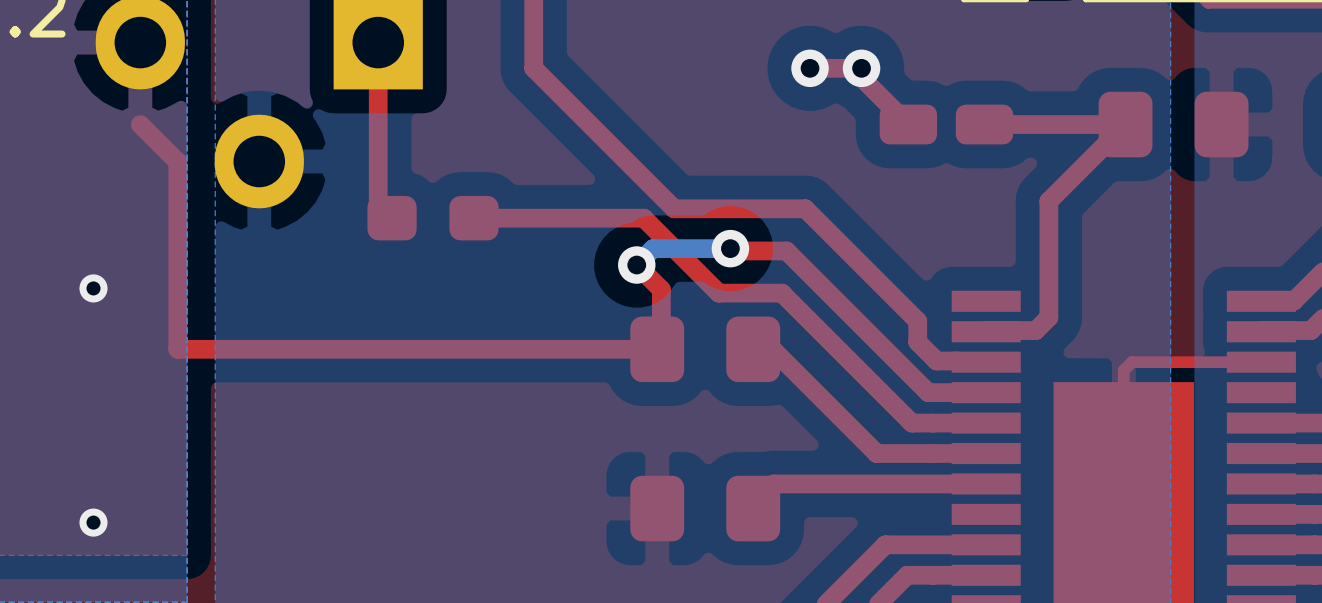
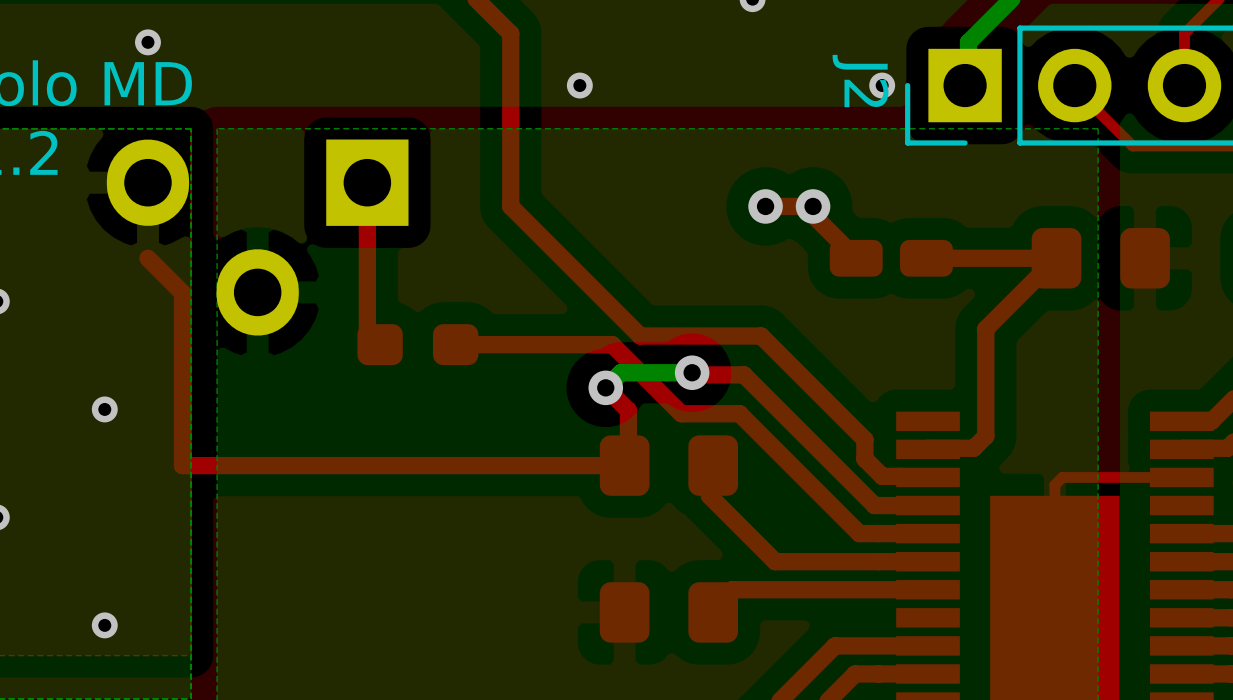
top track: (749, 349) (772, 349) (876, 453) -> (709, 465) (709, 495) (775, 561) (827, 561)

